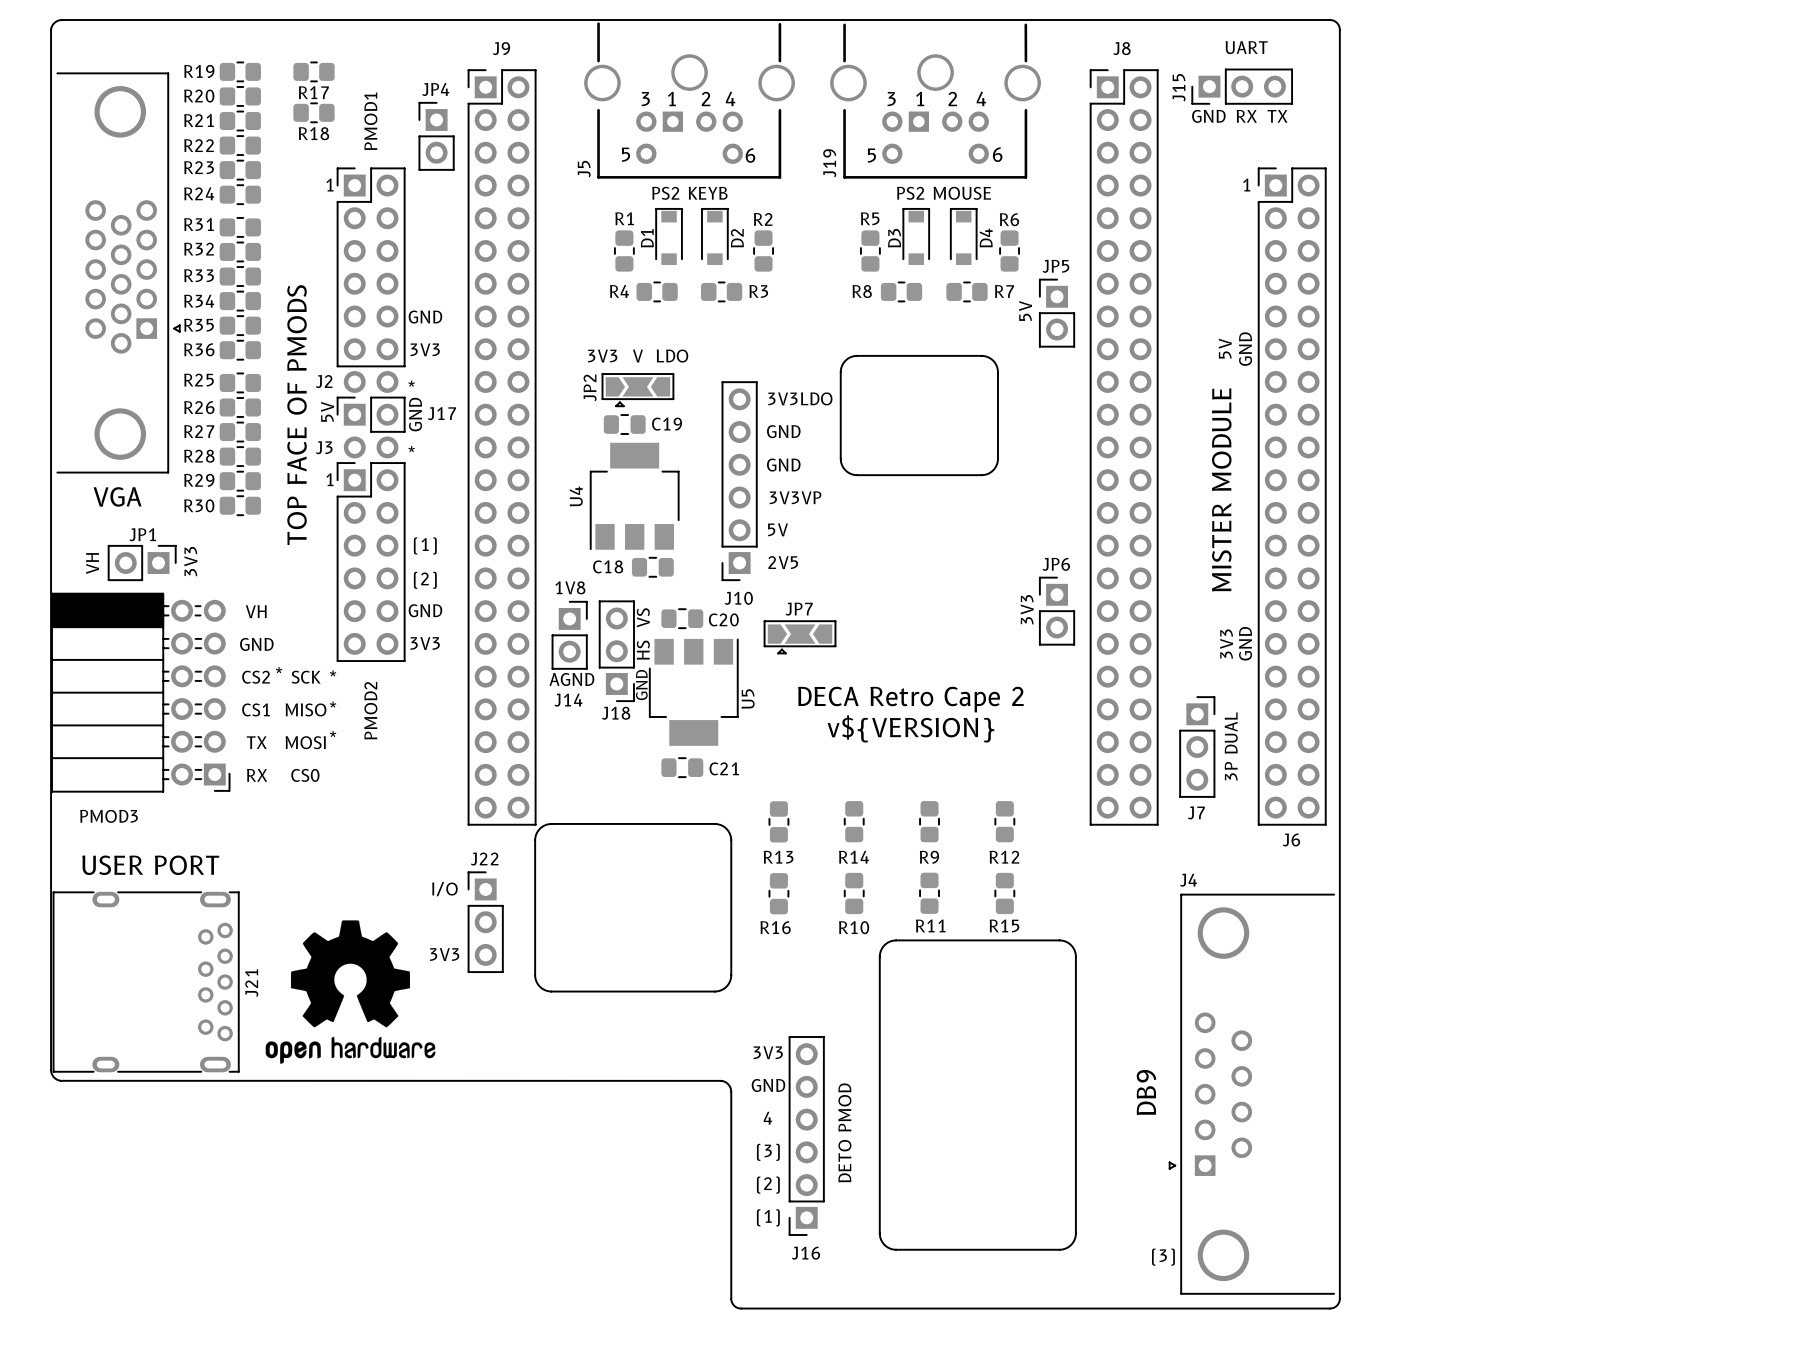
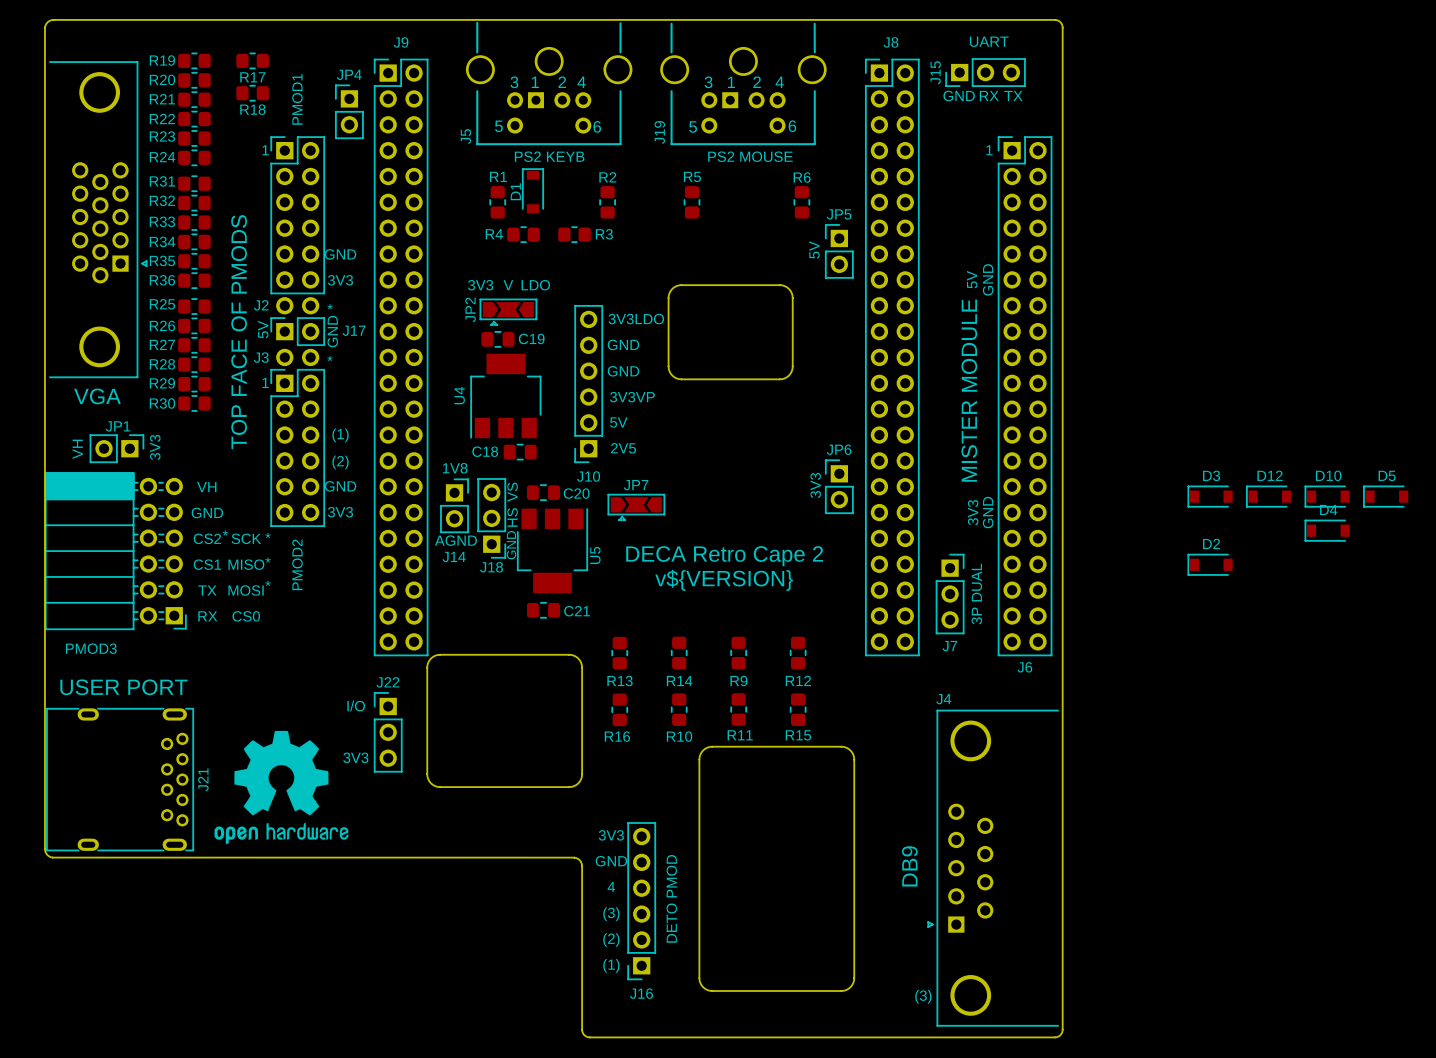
D2 rotation: 0° (714, 236) -> 90° counterclockwise (1210, 564)
D2 position: (714, 236) -> (1210, 564)
D3 rotation: 0° (916, 236) -> 90° counterclockwise (1210, 496)
D3 position: (916, 236) -> (1210, 496)
D4 rotation: 0° (963, 236) -> 90° counterclockwise (1327, 530)
D4 position: (963, 236) -> (1327, 530)
D3 name position: D3 (894, 238) -> D3 (1211, 475)
R8: (901, 291) -> none
R7: (967, 291) -> none
D12: none -> (1268, 496)
D10: none -> (1327, 496)
D5: none -> (1385, 496)

